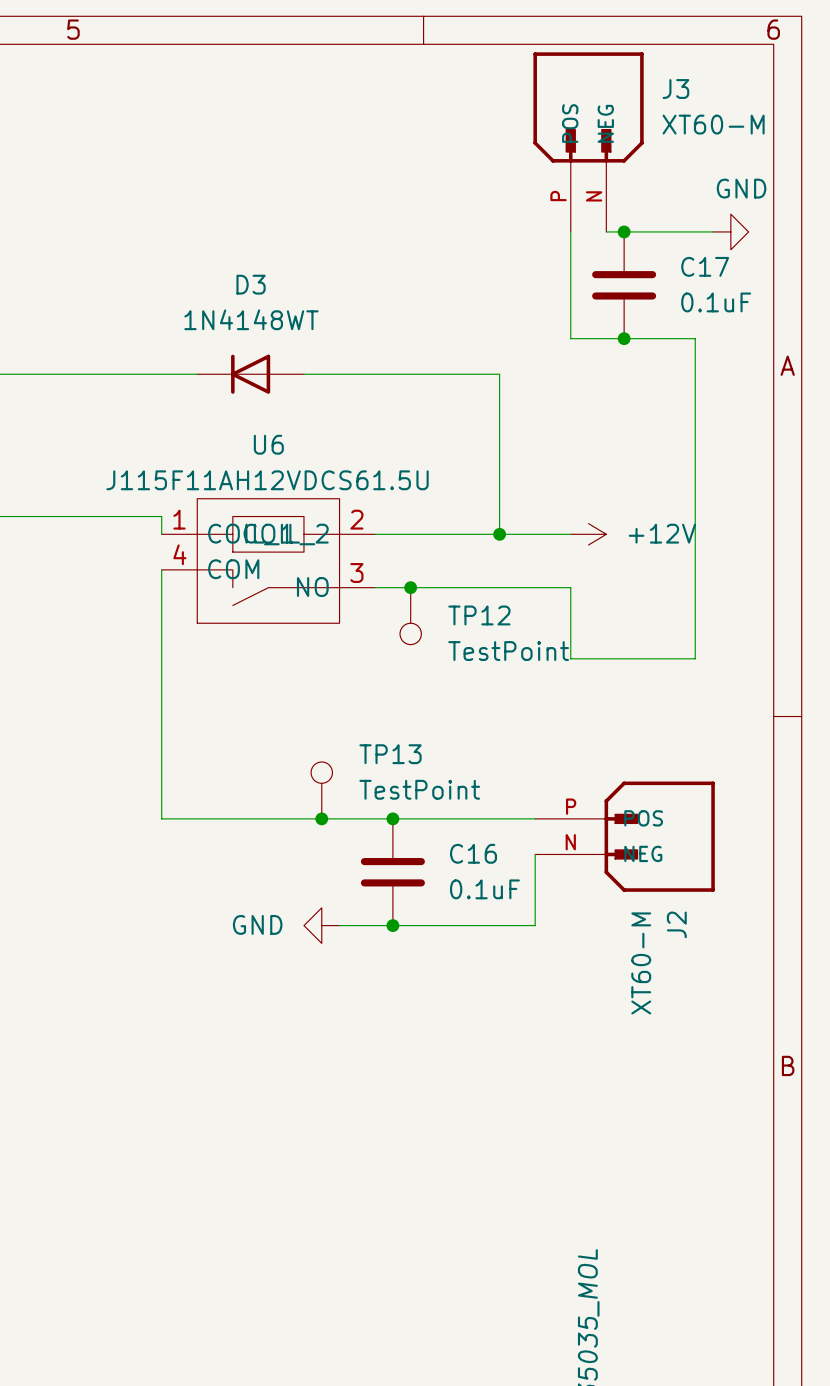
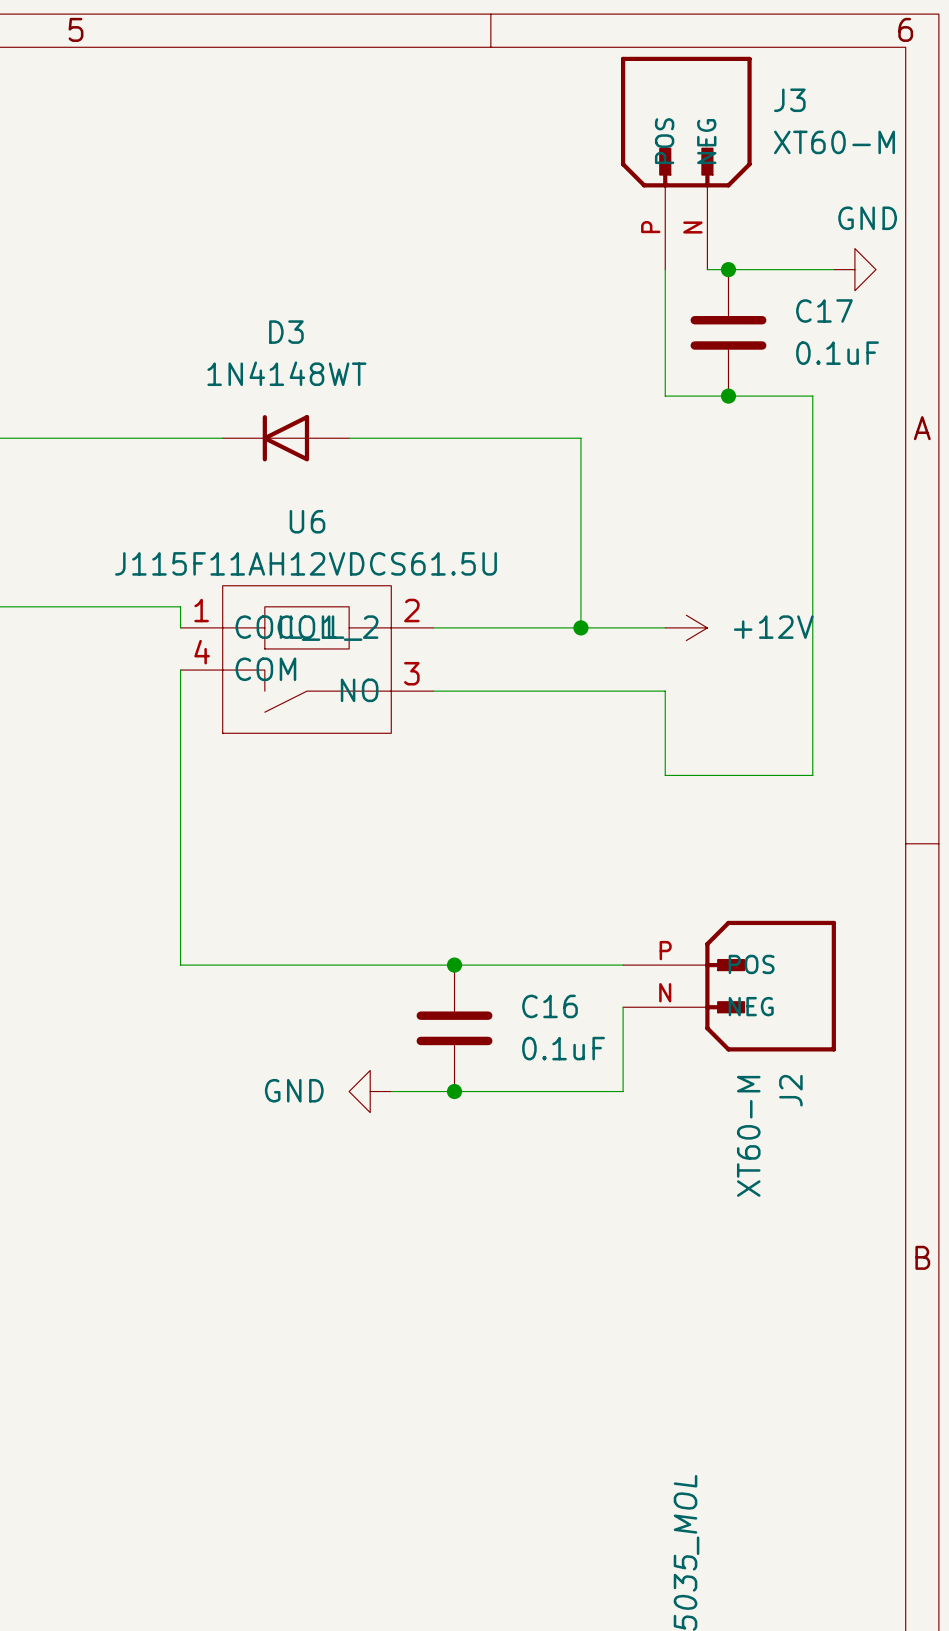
junction: (410, 587) -> none
TP12: TestPoint (410, 616) -> none
TP13: TestPoint (321, 790) -> none
junction: (321, 818) -> none

